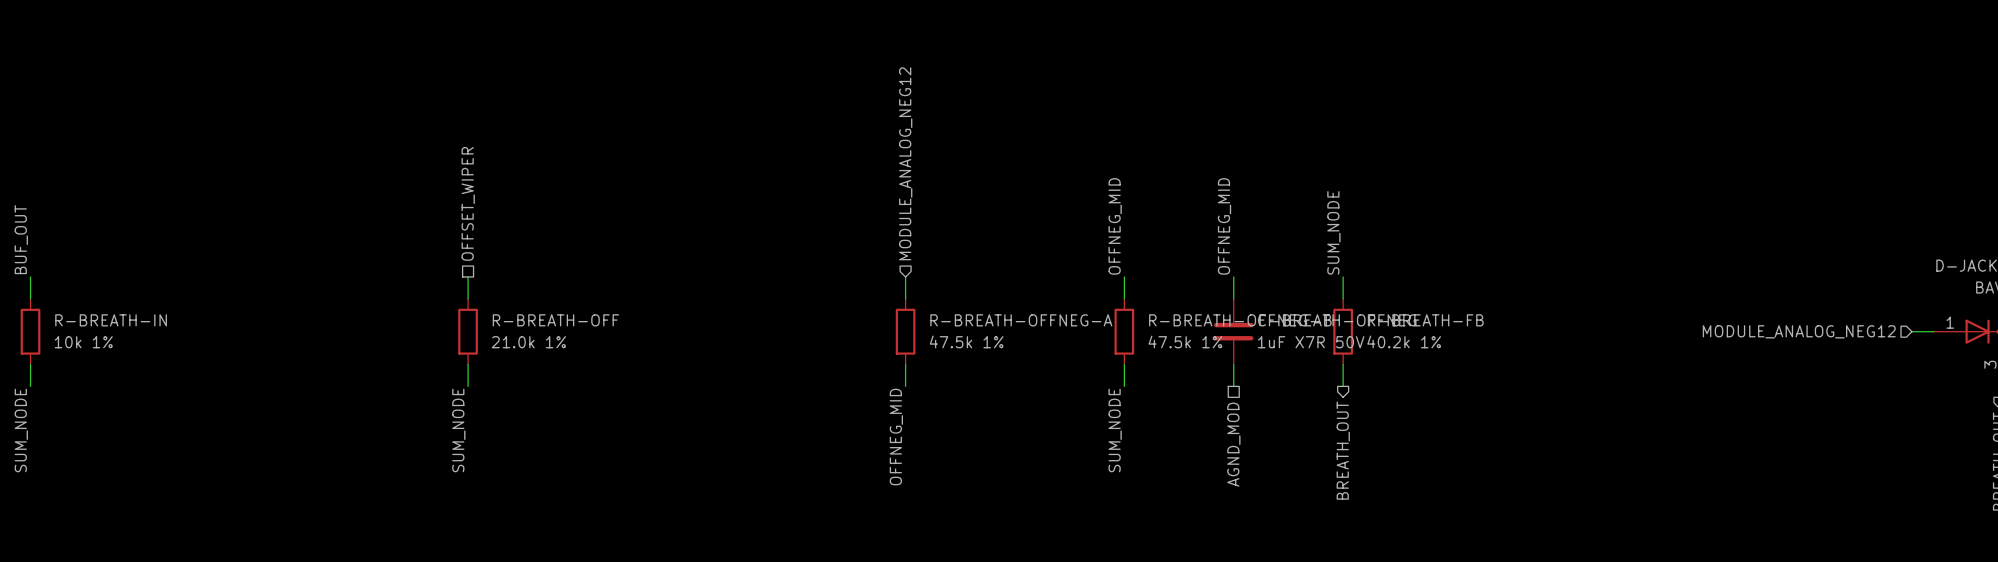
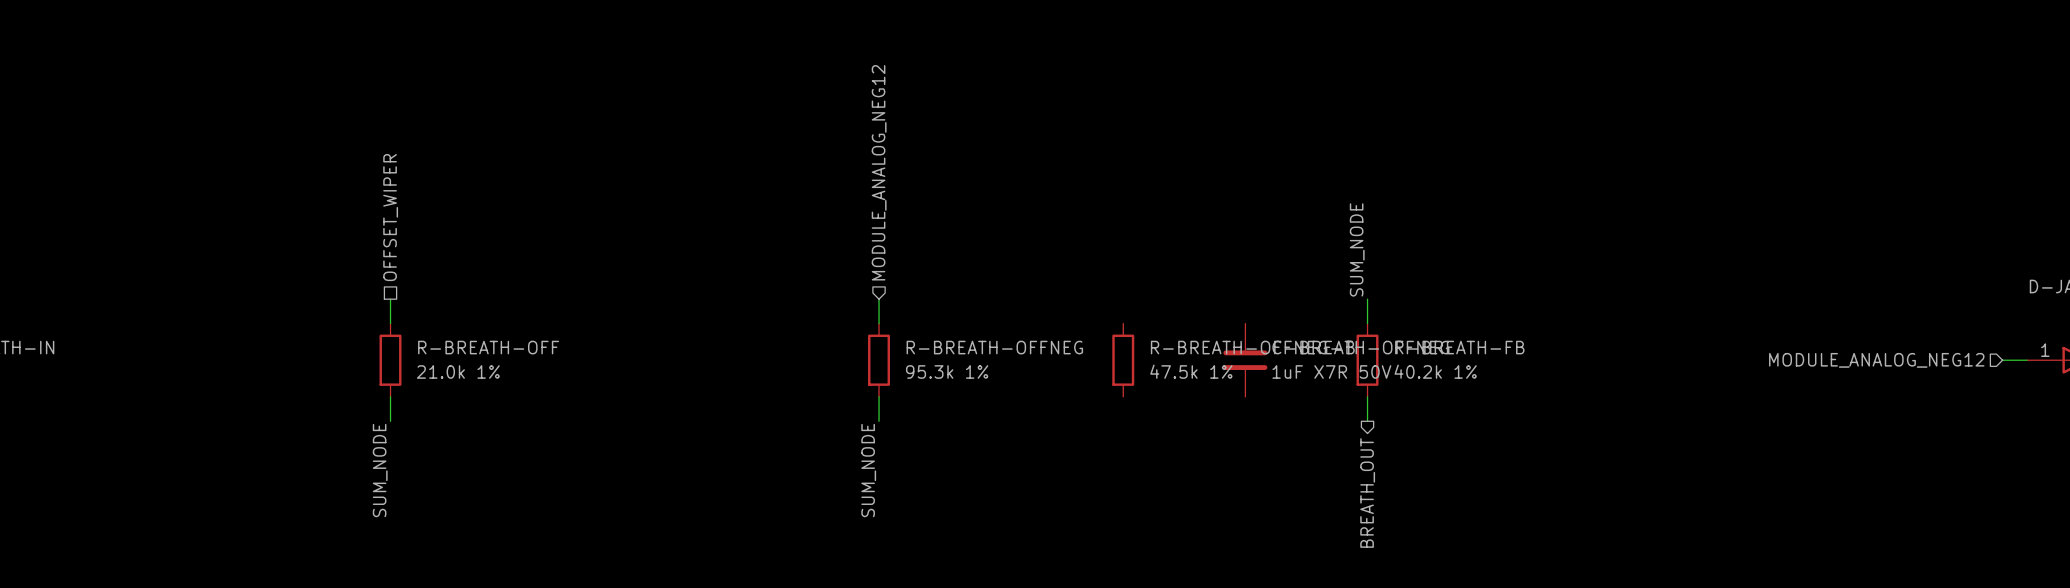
label: OFFNEG_MID (1115, 226) -> none
label: OFFNEG_MID (1224, 226) -> none
wire: (1124, 277) (1124, 298) -> none
wire: (1233, 277) (1233, 298) -> none
R-BREATH-OFFNEG-A name: R-BREATH-OFFNEG-A (1021, 320) -> R-BREATH-OFFNEG (994, 347)
R-BREATH-OFFNEG-A value: 47.5k 1% (966, 341) -> 95.3k 1% (947, 371)
wire: (1124, 364) (1124, 386) -> none
wire: (1233, 364) (1233, 386) -> none
label: SUM_NODE (1115, 430) -> none
label: OFFNEG_MID (896, 436) -> SUM_NODE (868, 470)
hierarchical label: AGND_MOD (1233, 444) -> none

